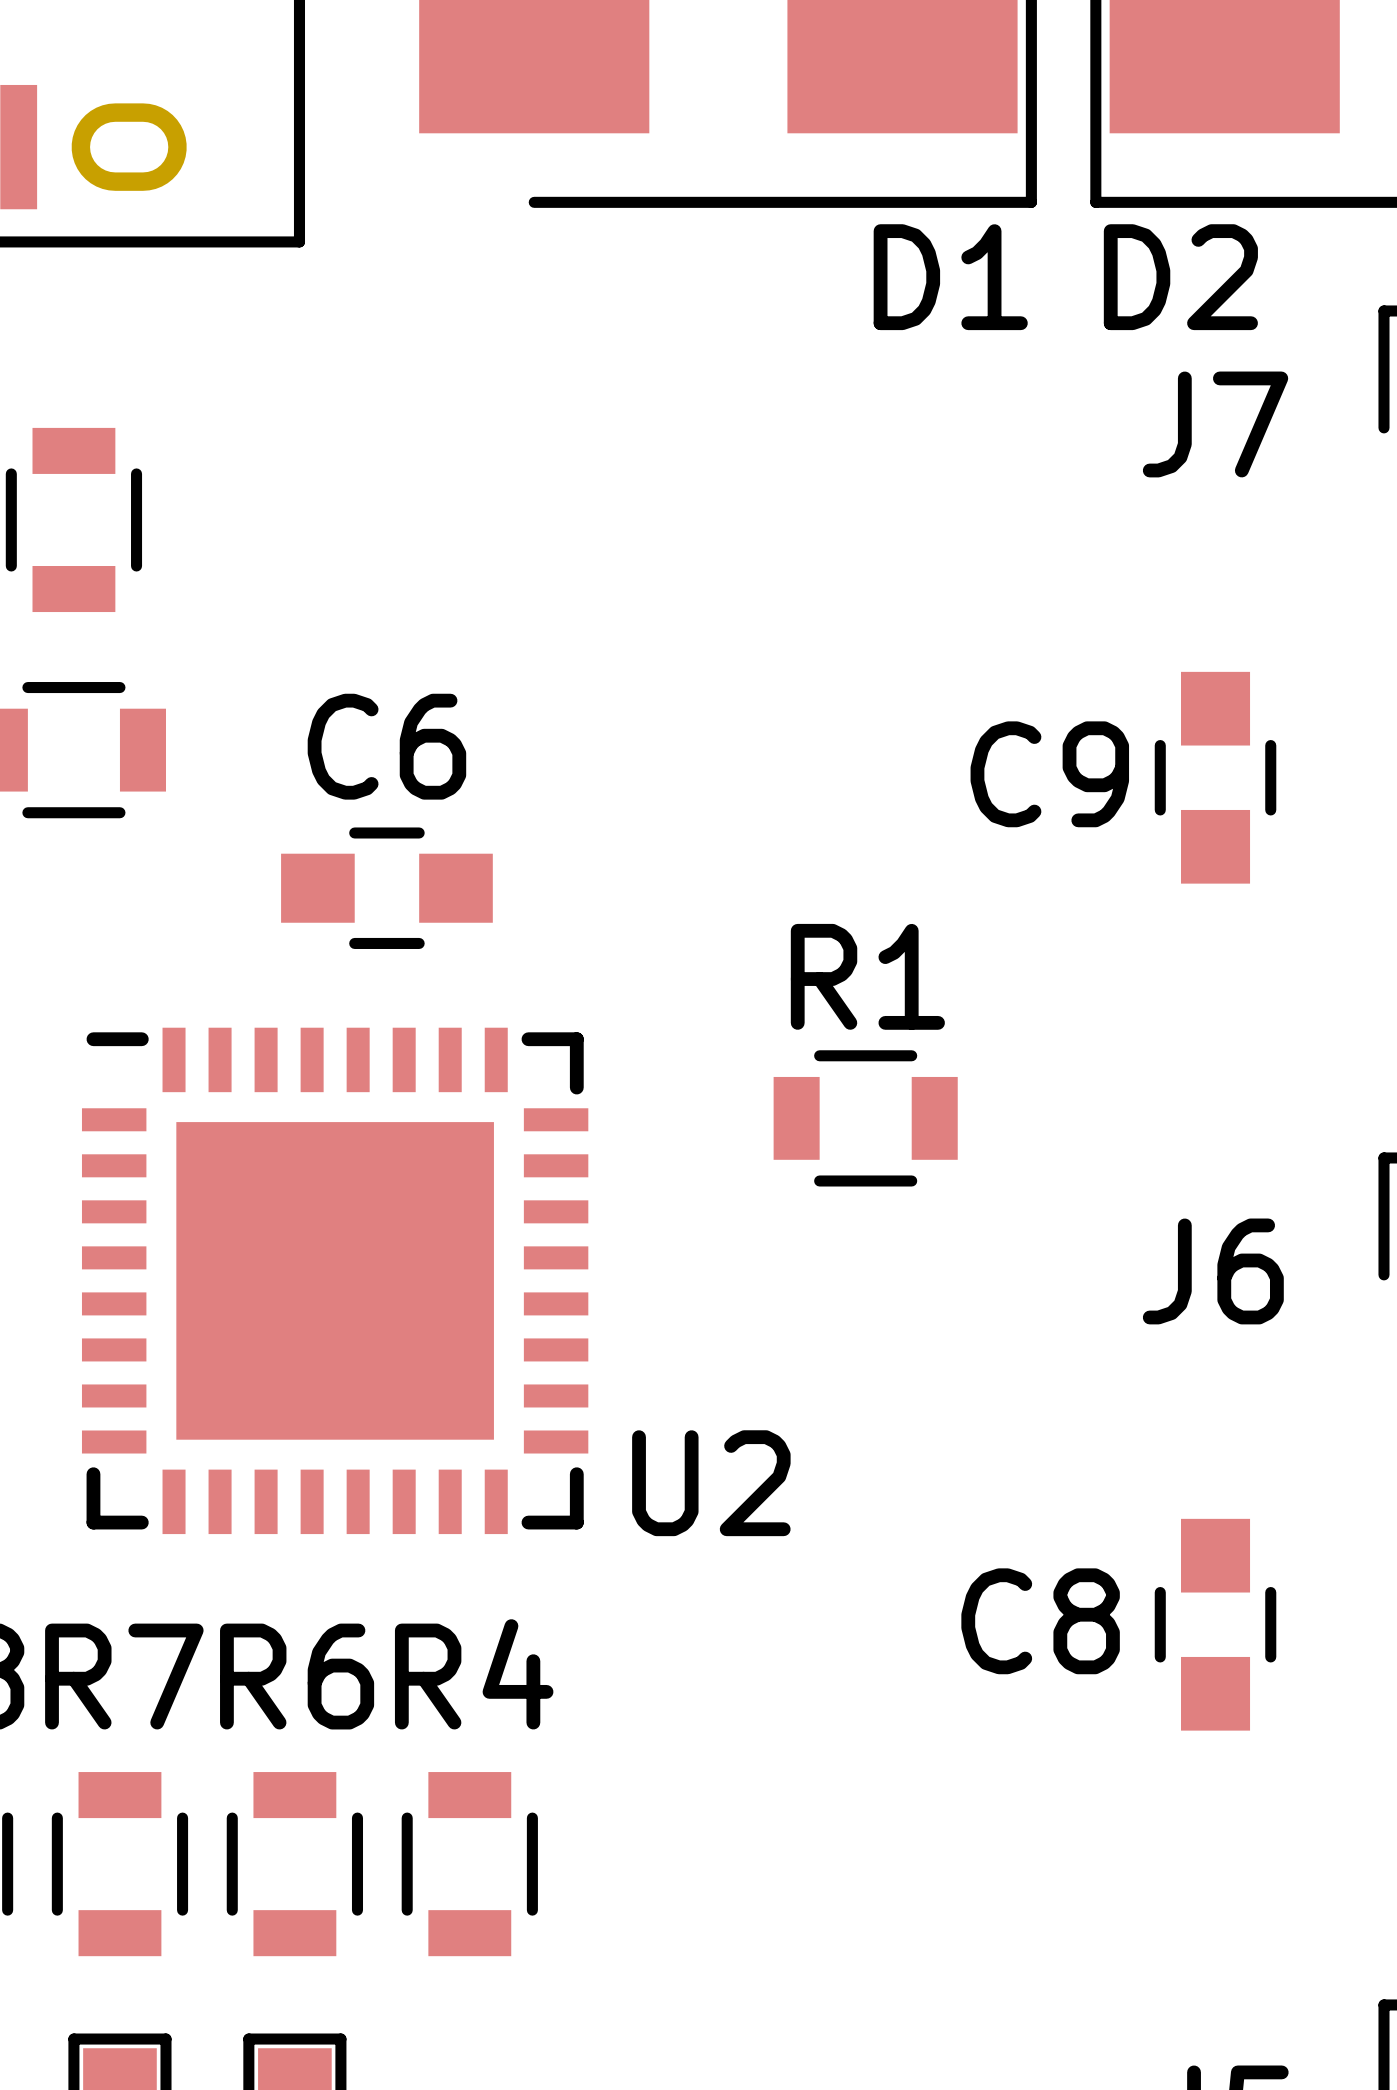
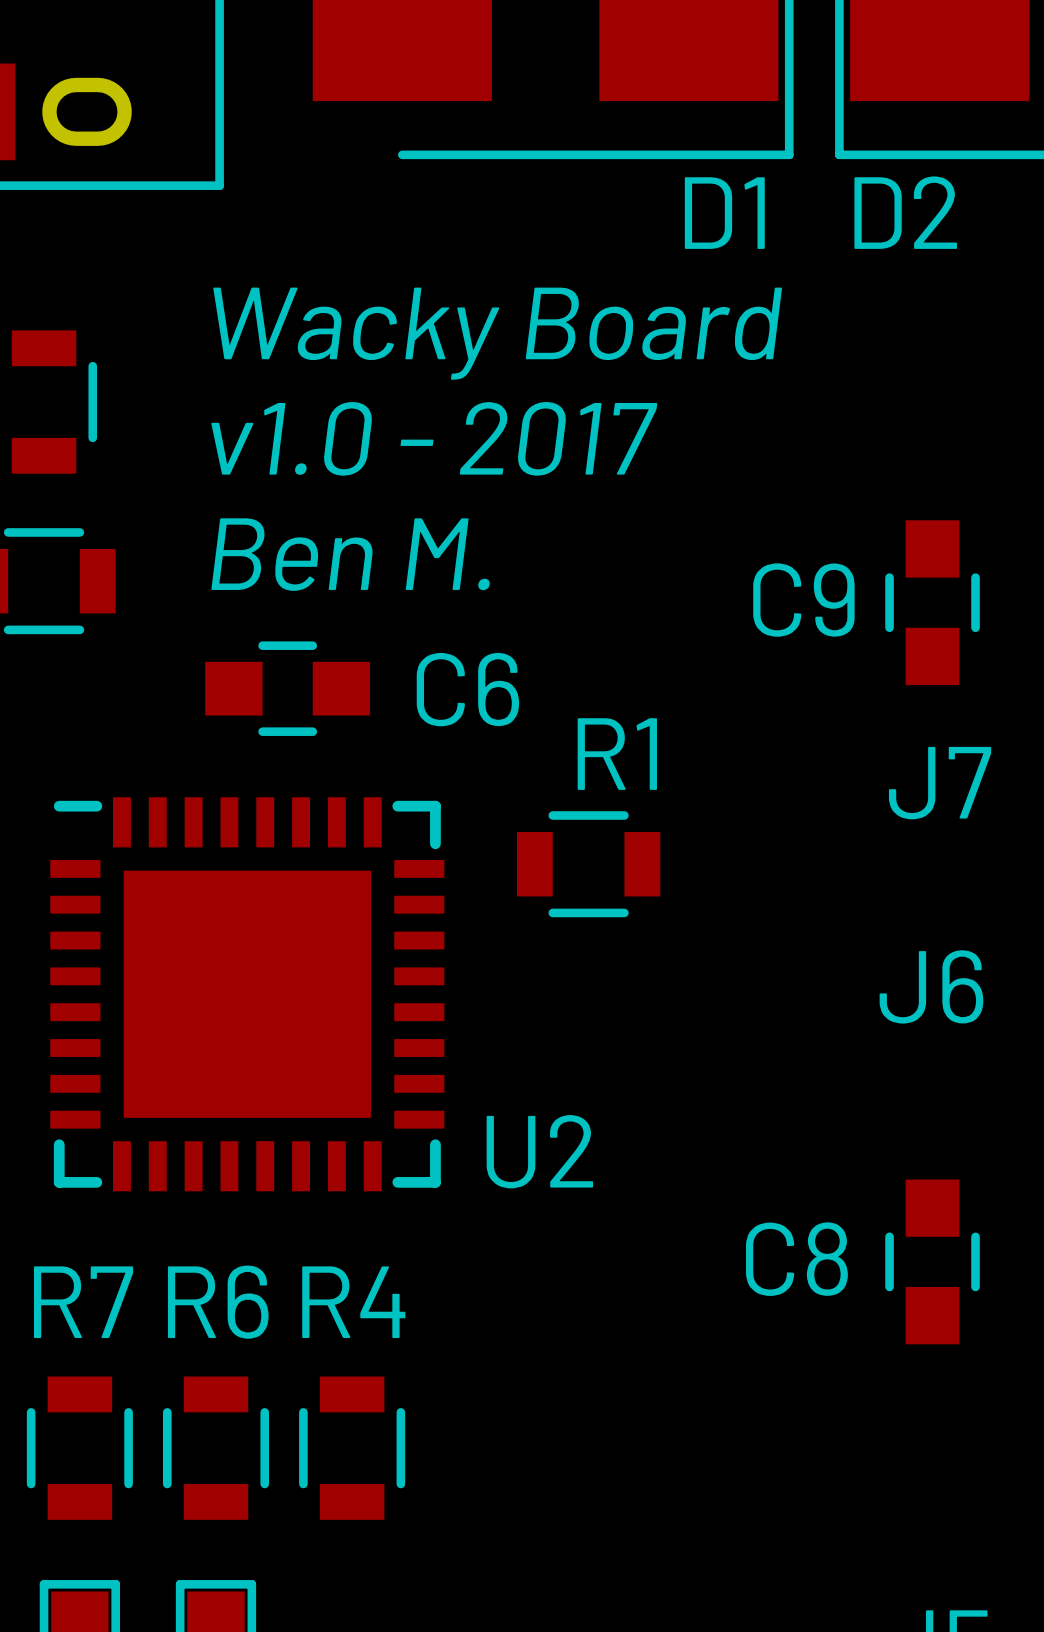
J7 name position: J7 (1215, 424) -> J7 (940, 783)
text: none -> Wacky Board (497, 333)
text: none -> v1.0 - 2017 (434, 438)
text: none -> Ben M. (350, 554)
C6 name position: C6 (386, 746) -> C6 (467, 689)
R1 name position: R1 (867, 976) -> R1 (617, 754)
R1 position: (865, 1118) -> (588, 864)

